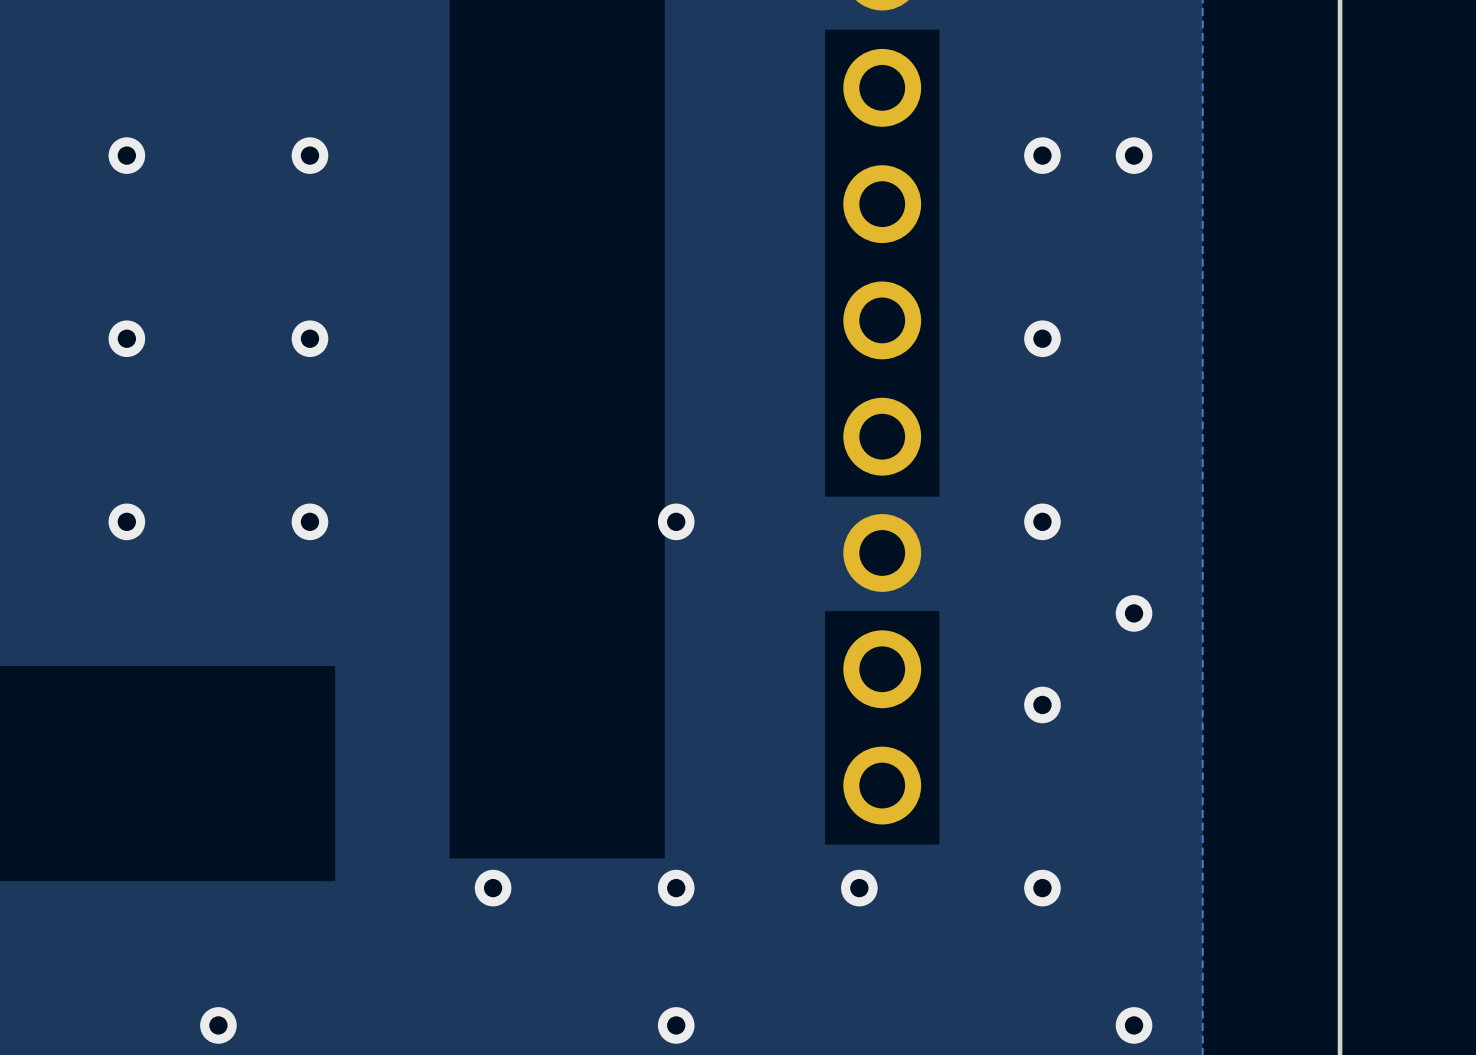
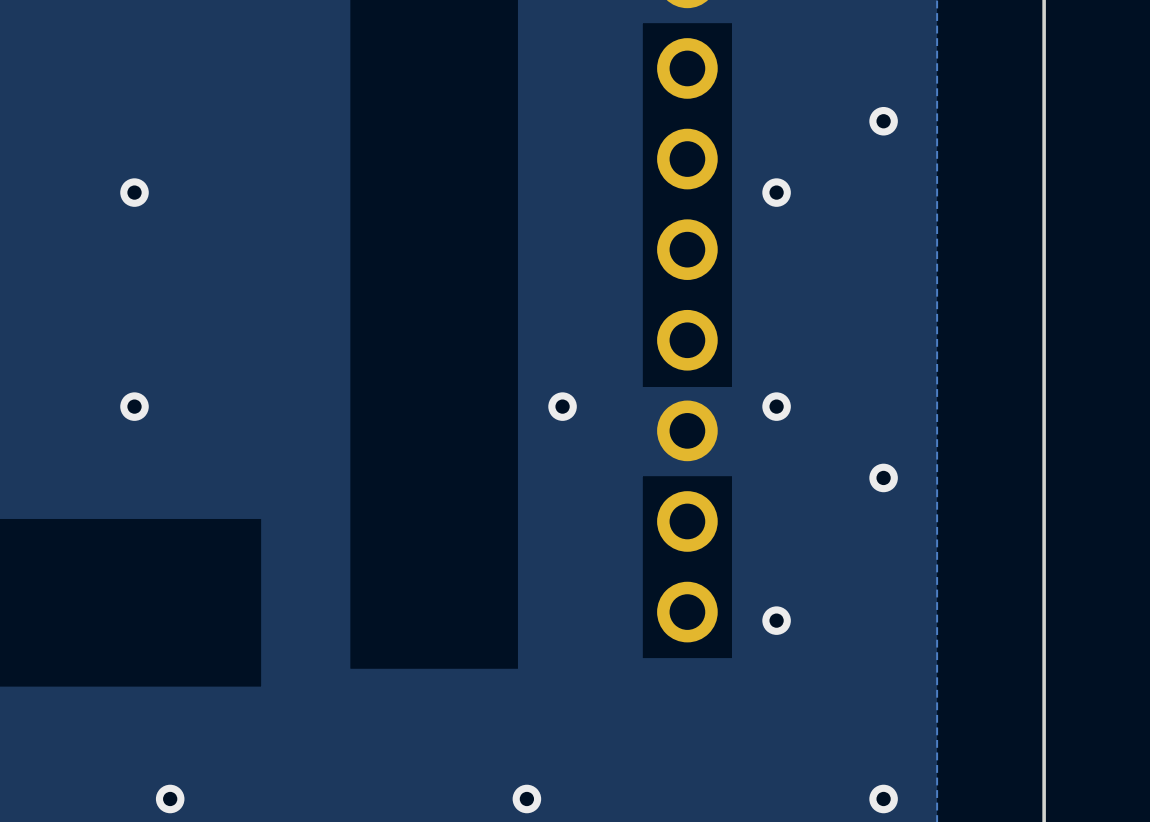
via: (126, 155) -> none
via: (309, 155) -> none
via: (1042, 155) -> none
via: none -> (134, 192)
via: none -> (776, 192)
via: (126, 338) -> none
via: (309, 338) -> none
via: (1042, 338) -> none
via position: (126, 521) -> (134, 406)
via: (309, 521) -> none
via position: (676, 521) -> (562, 406)
via position: (1042, 521) -> (776, 406)
via: (1042, 704) -> none
via: none -> (776, 620)
via: (493, 888) -> none
via: (676, 888) -> none
via: (859, 888) -> none
via: (1042, 888) -> none

